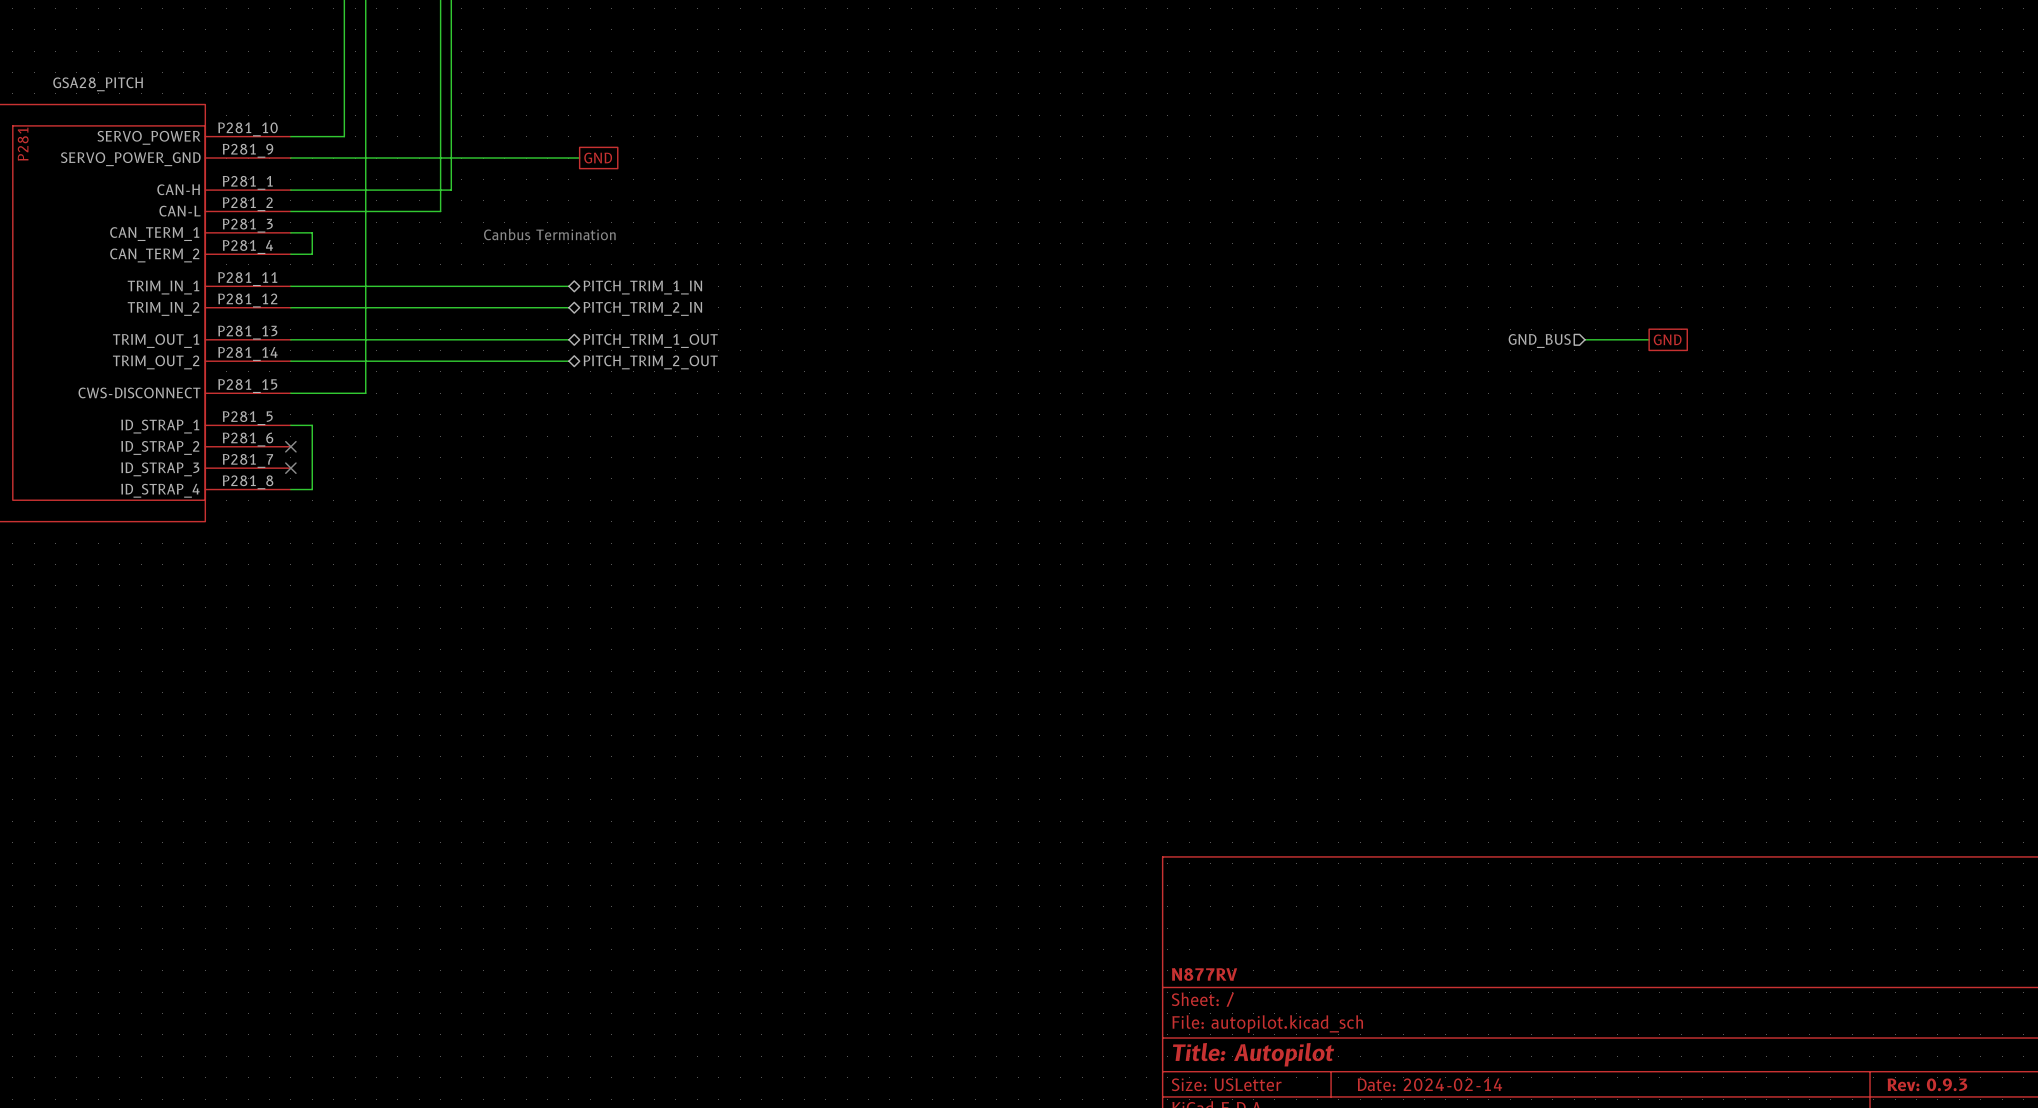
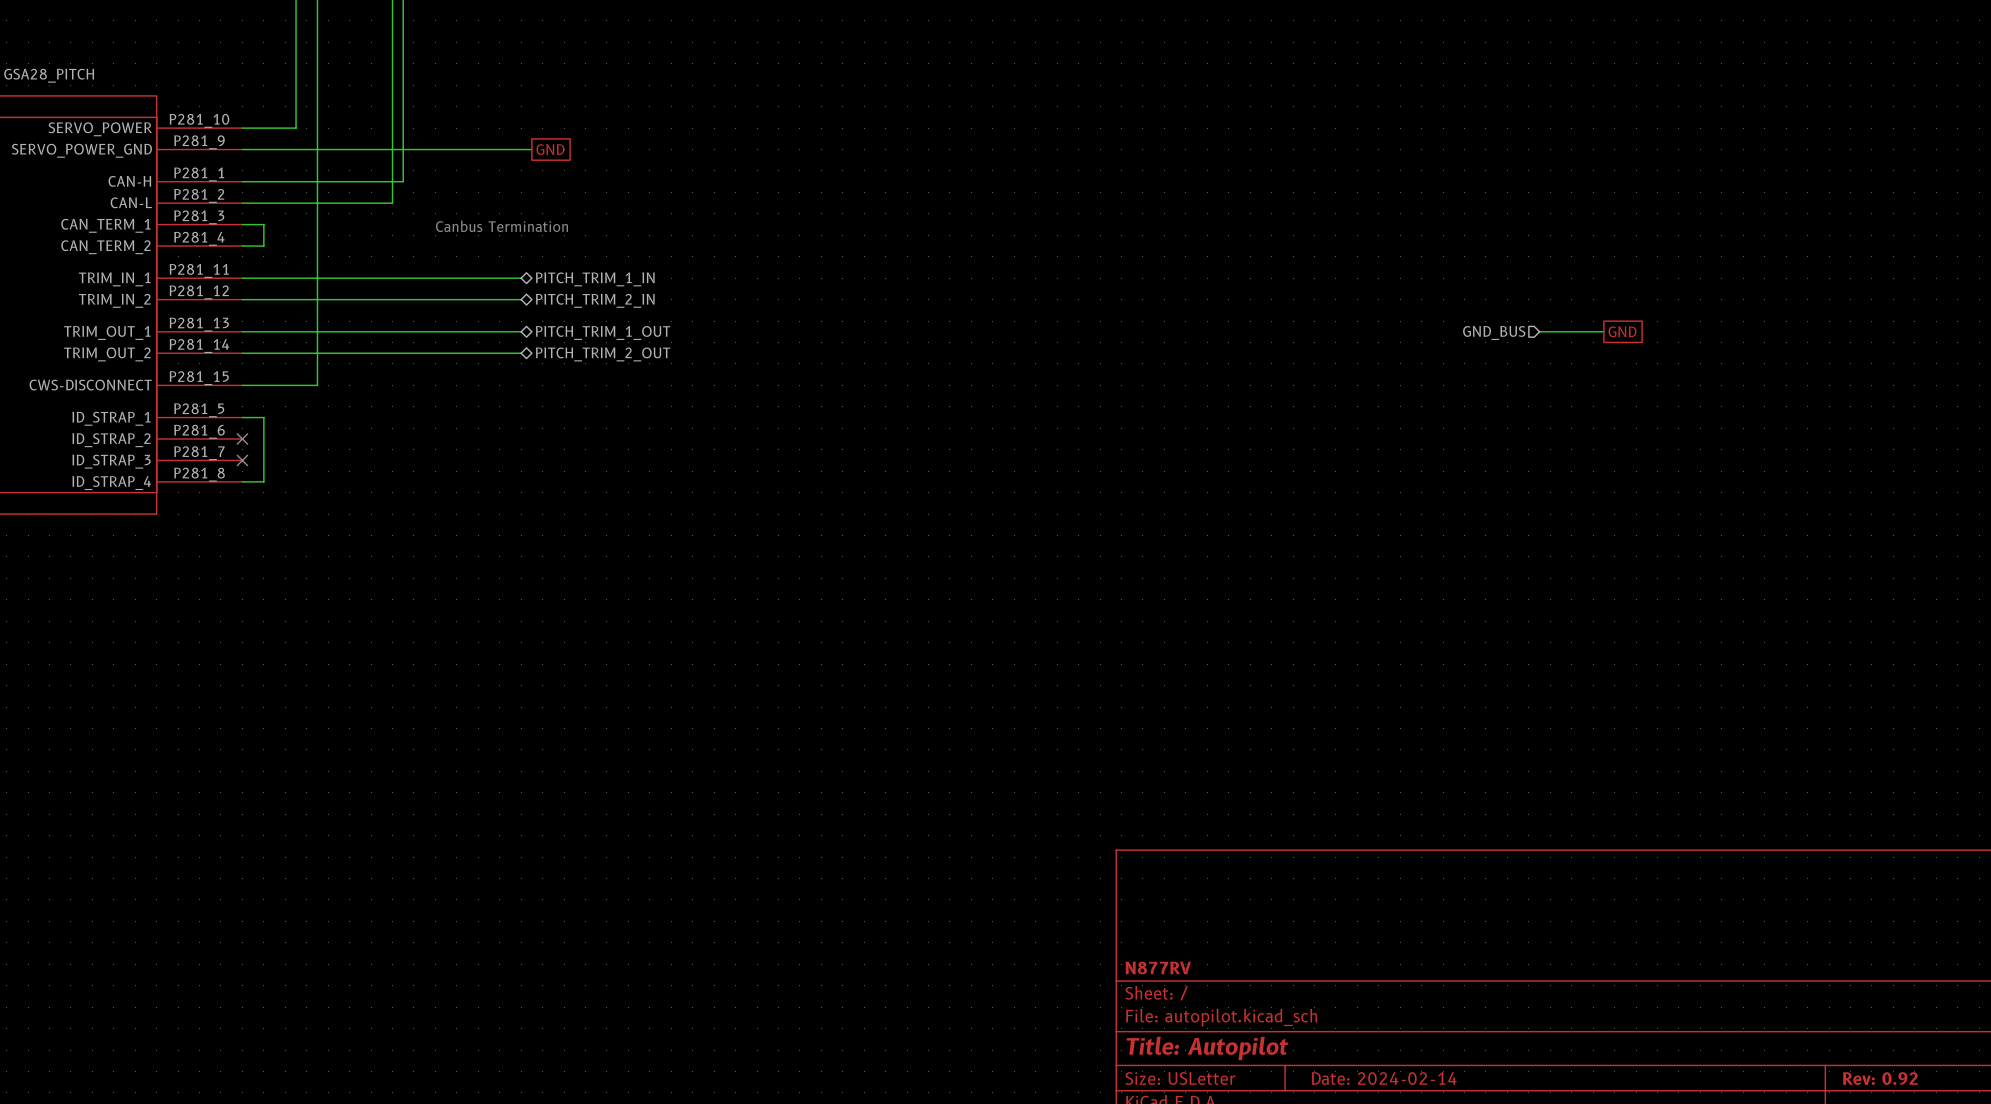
title block: Rev: 0.9.3 (1927, 1084) -> Rev: 0.92 (1880, 1078)

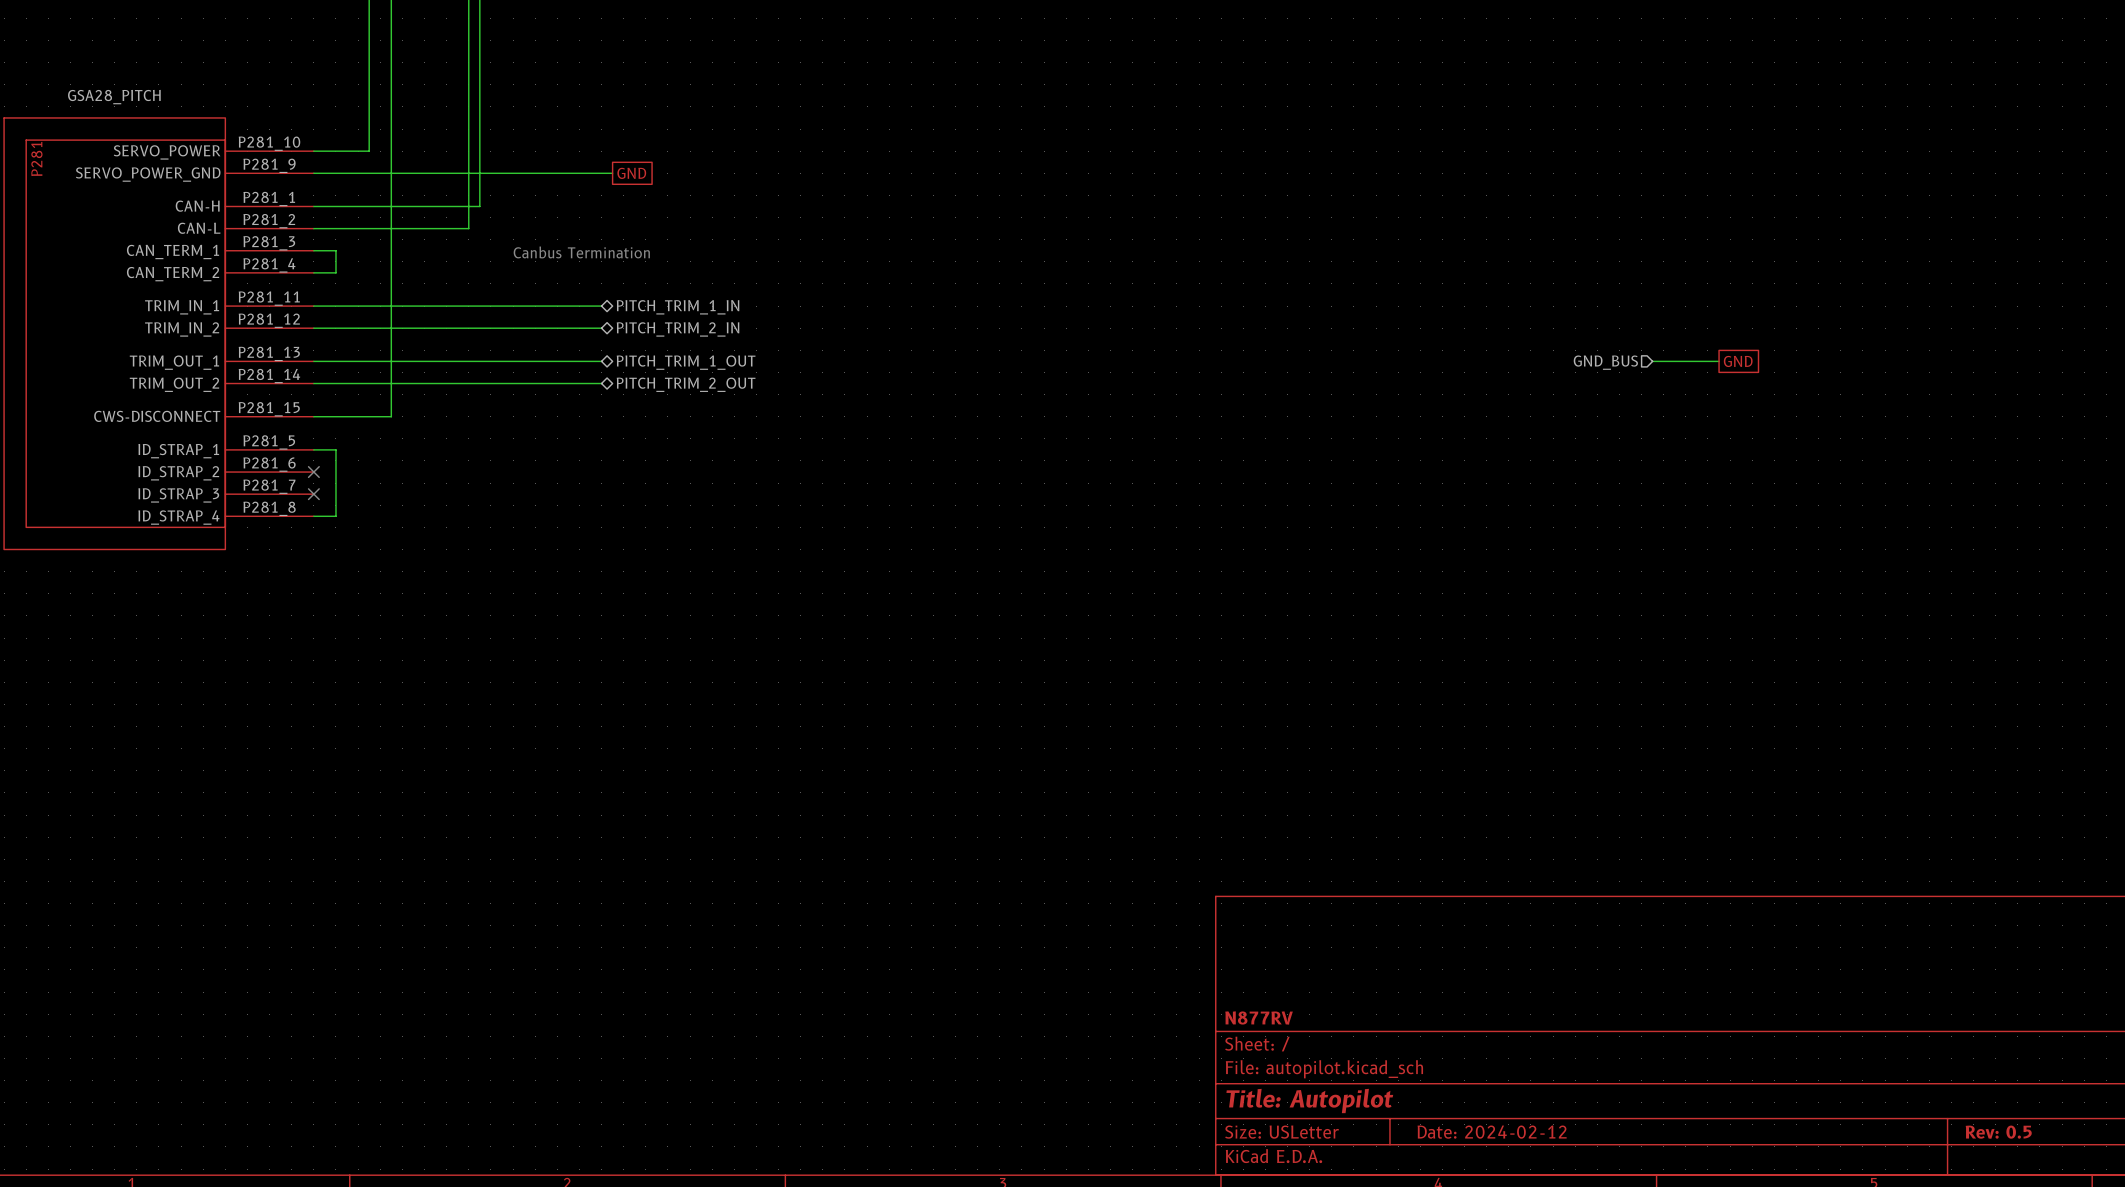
title block: Date: 2024-02-14 (1384, 1078) -> Date: 2024-02-12 (1492, 1132)
title block: Rev: 0.92 (1880, 1078) -> Rev: 0.5 (1998, 1132)

